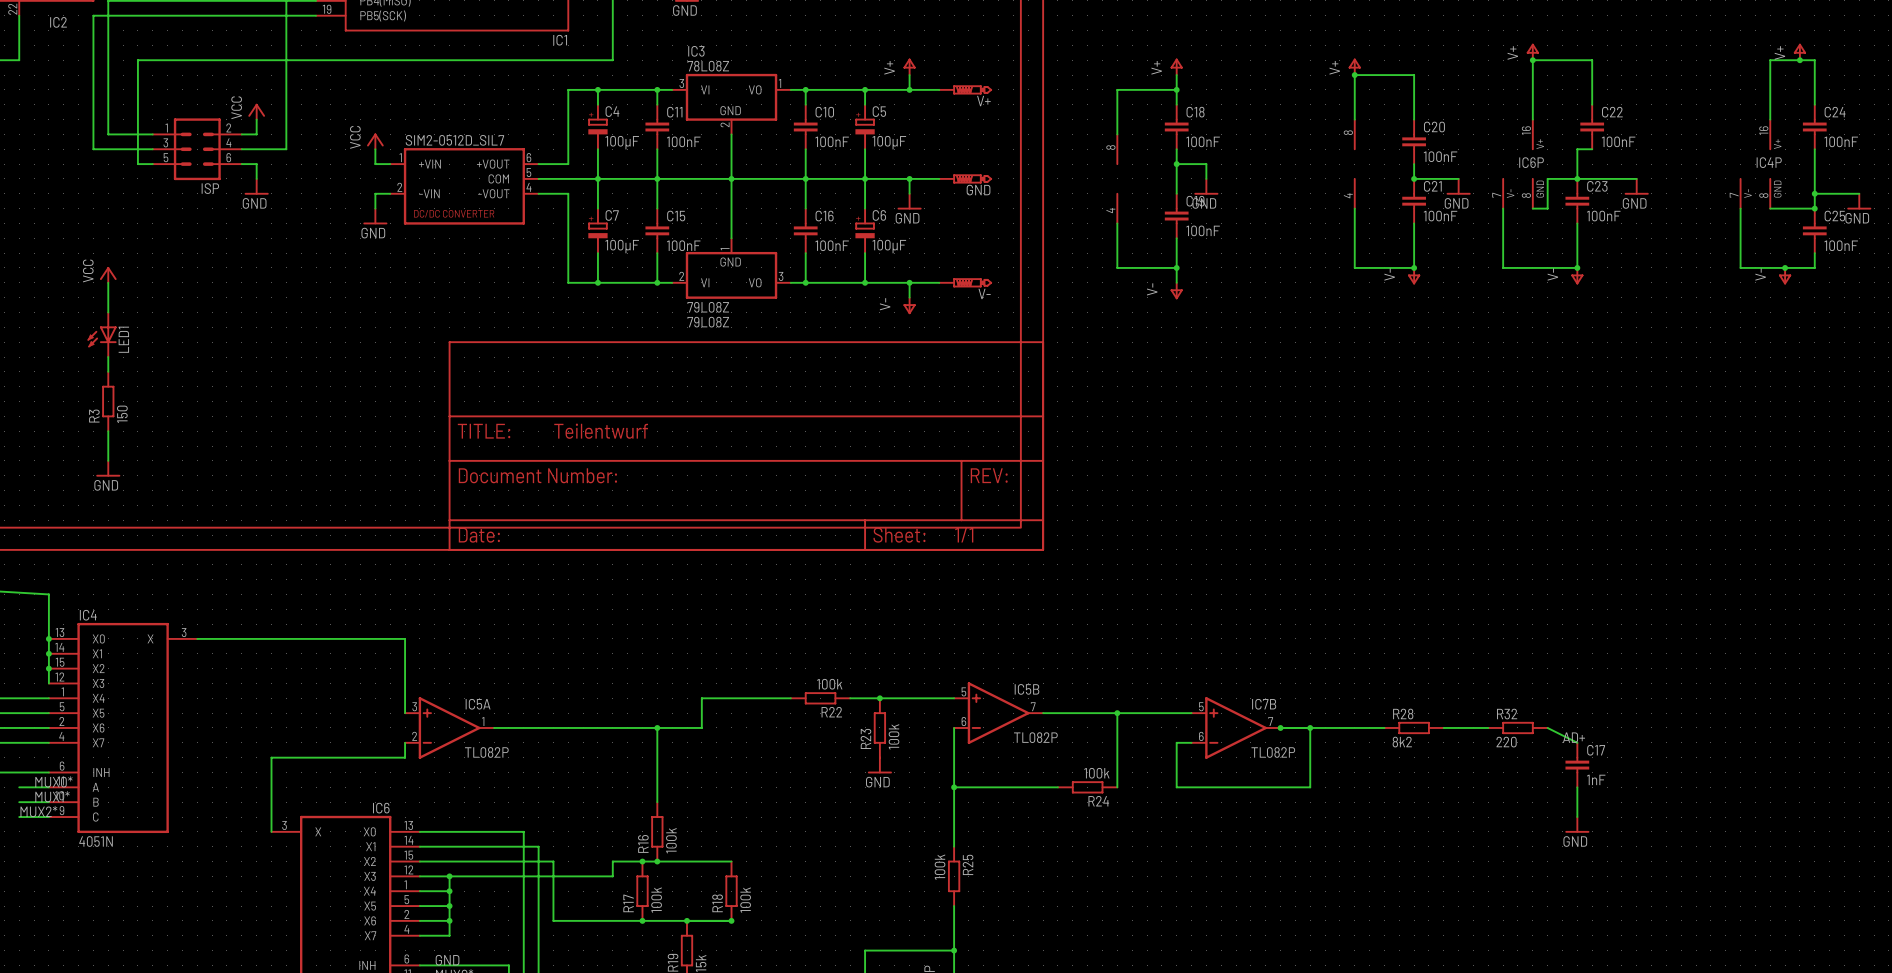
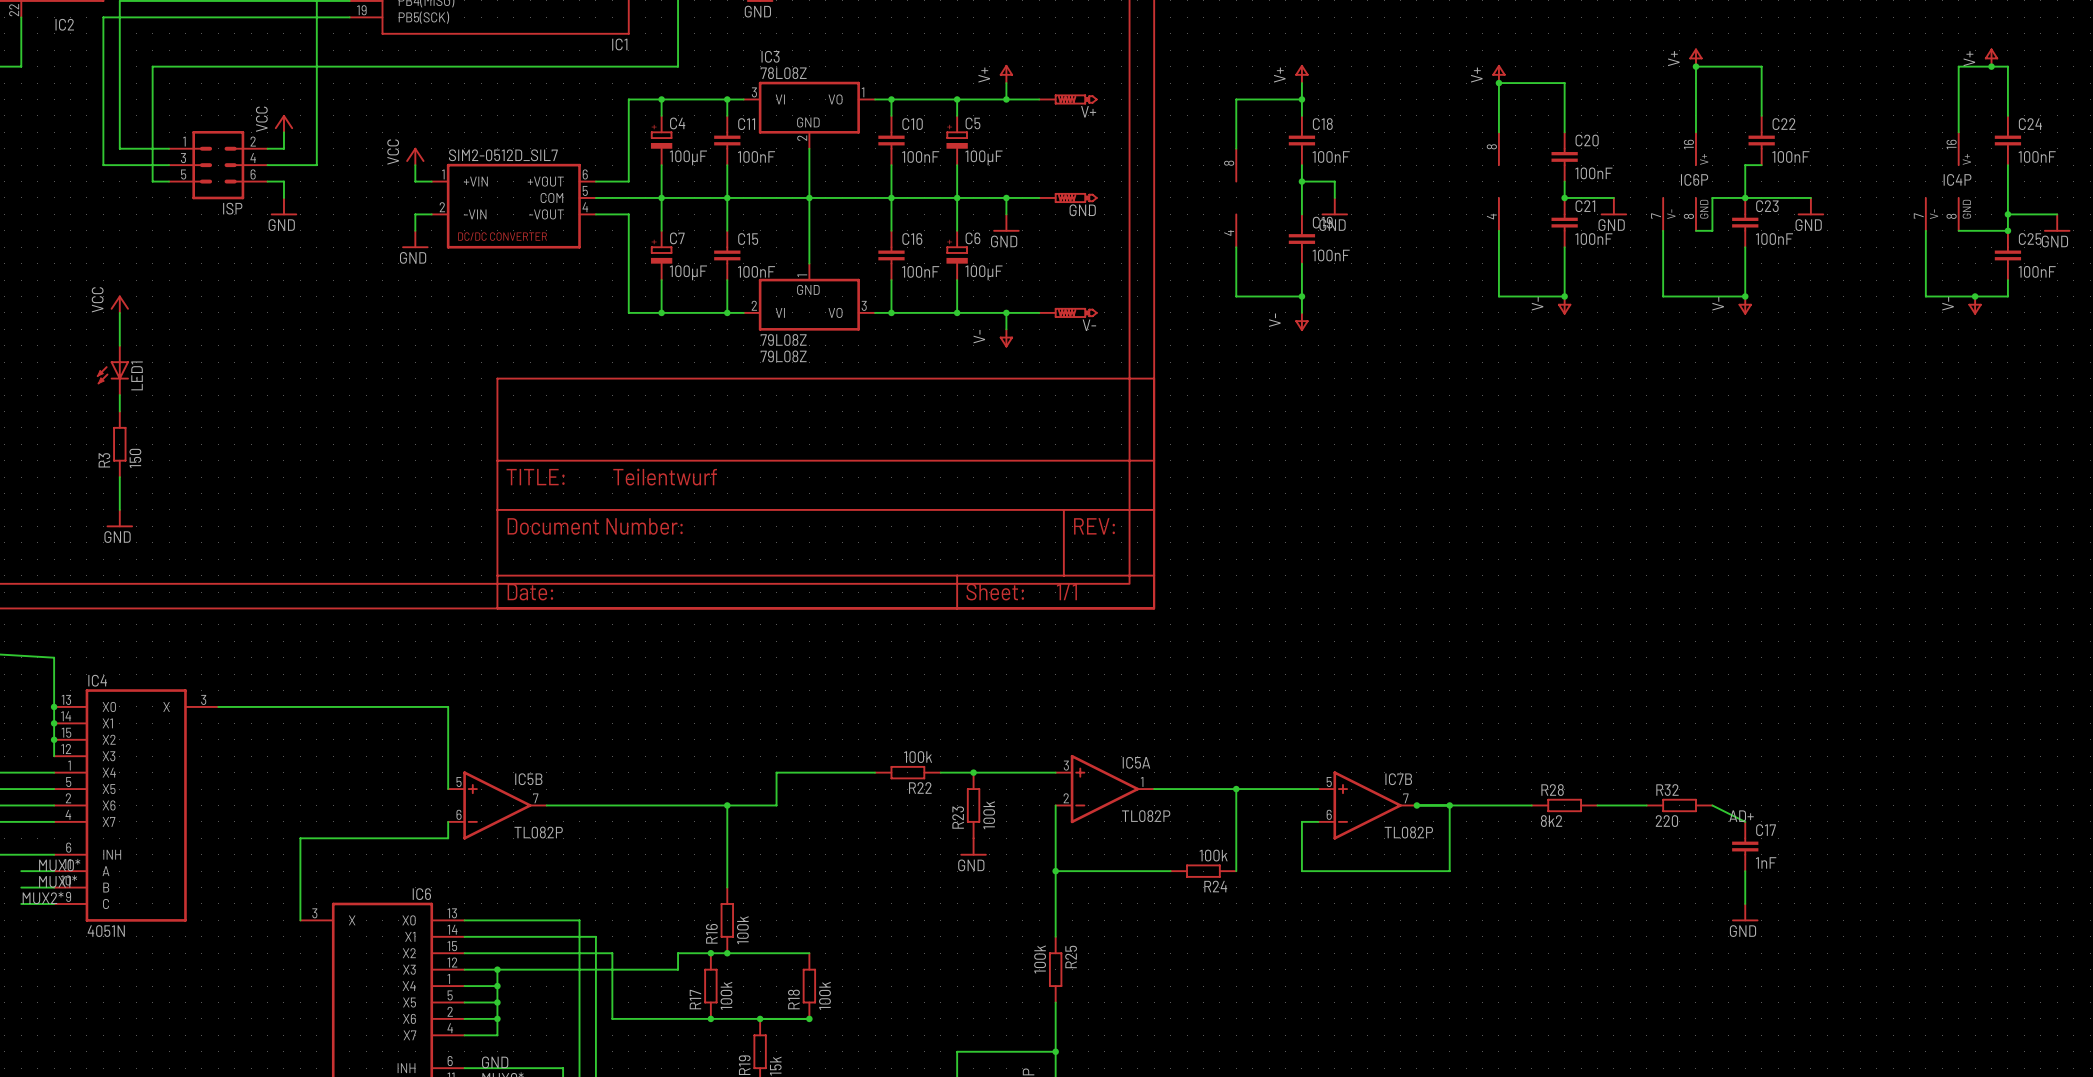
IC5B position: (998, 713) -> (497, 805)
IC5A position: (449, 727) -> (1104, 789)

